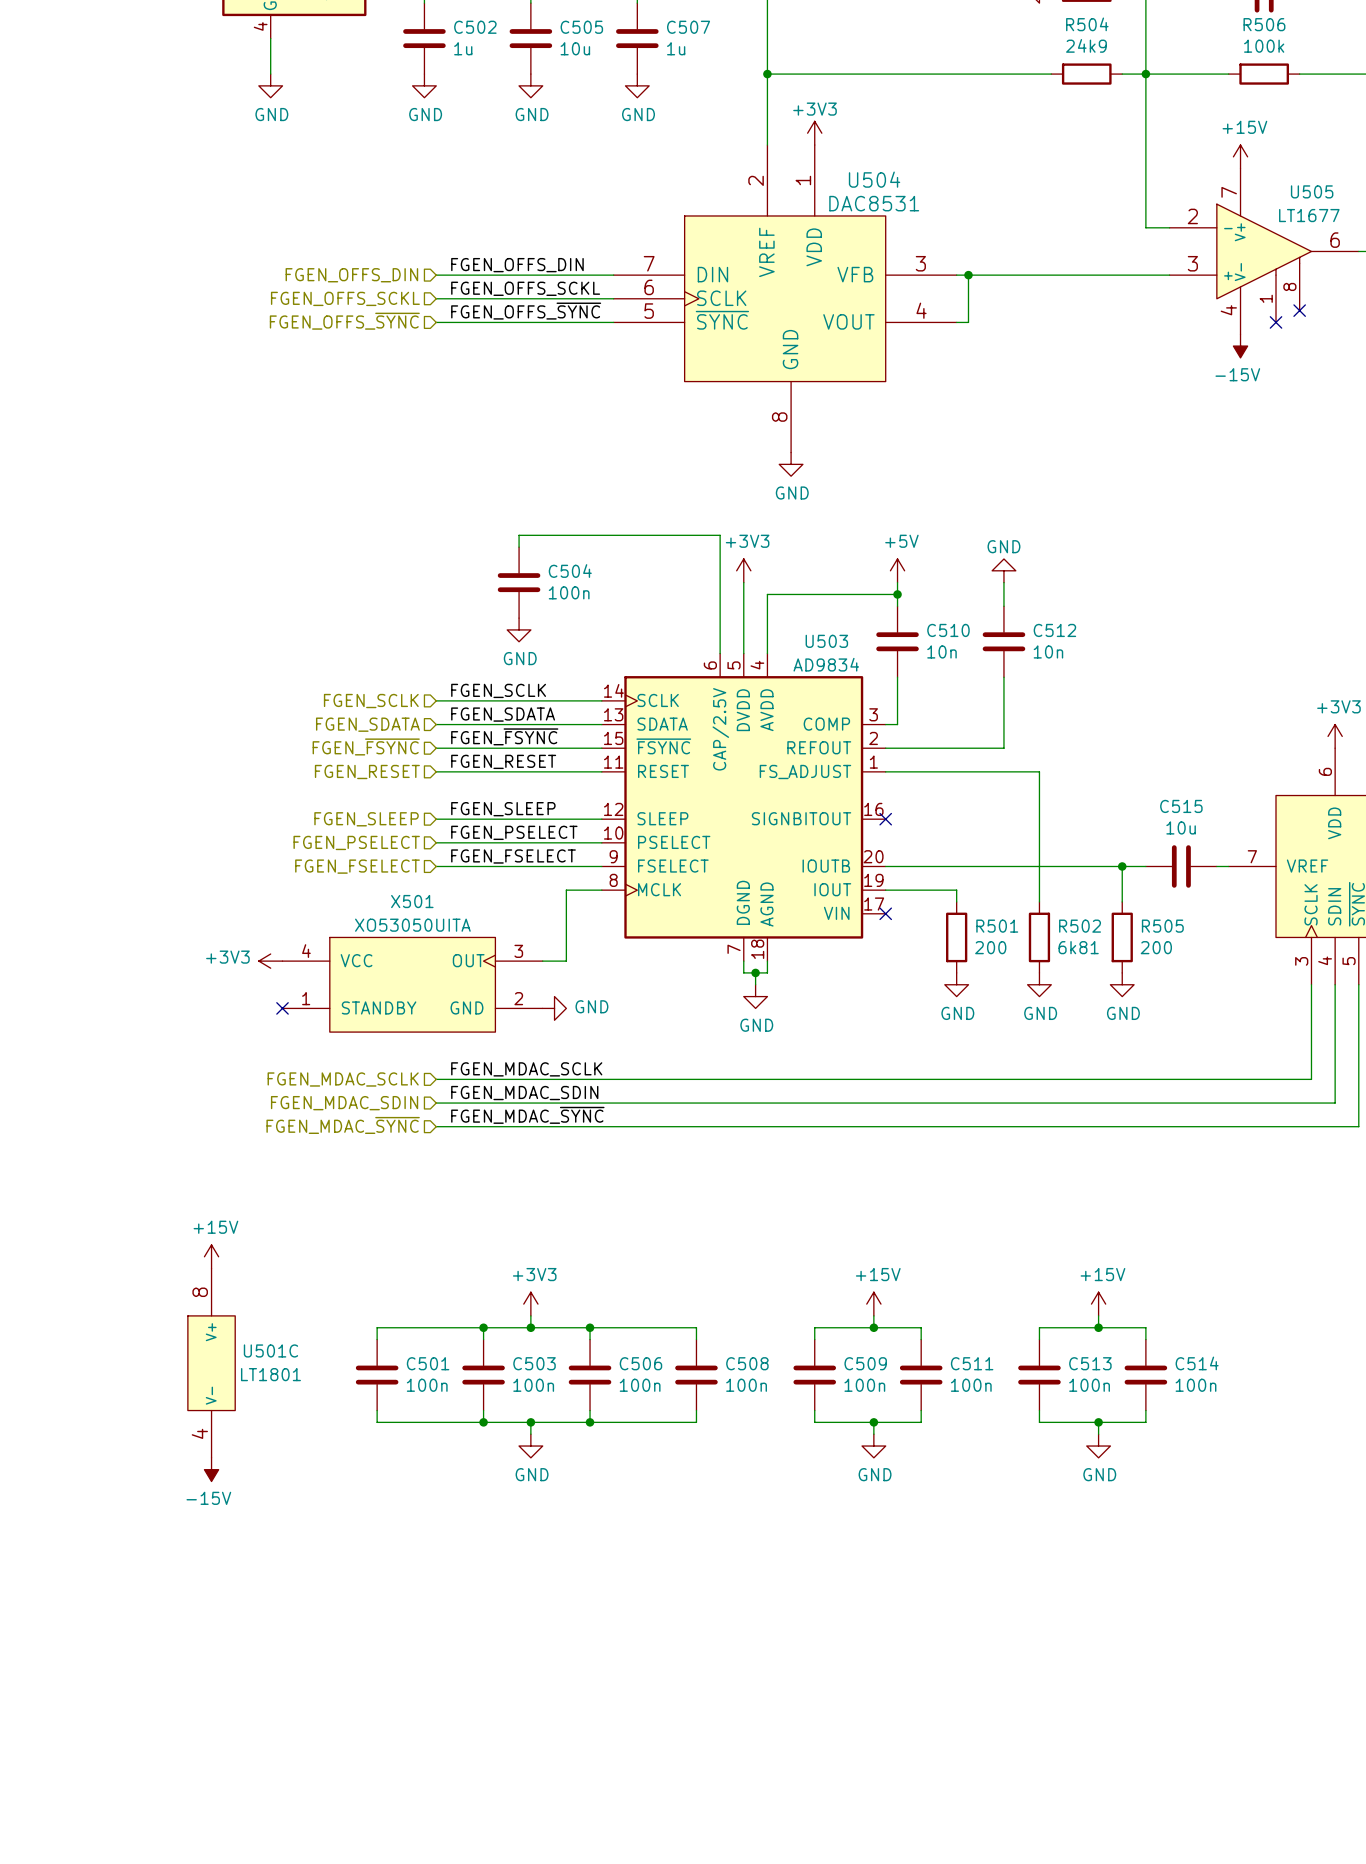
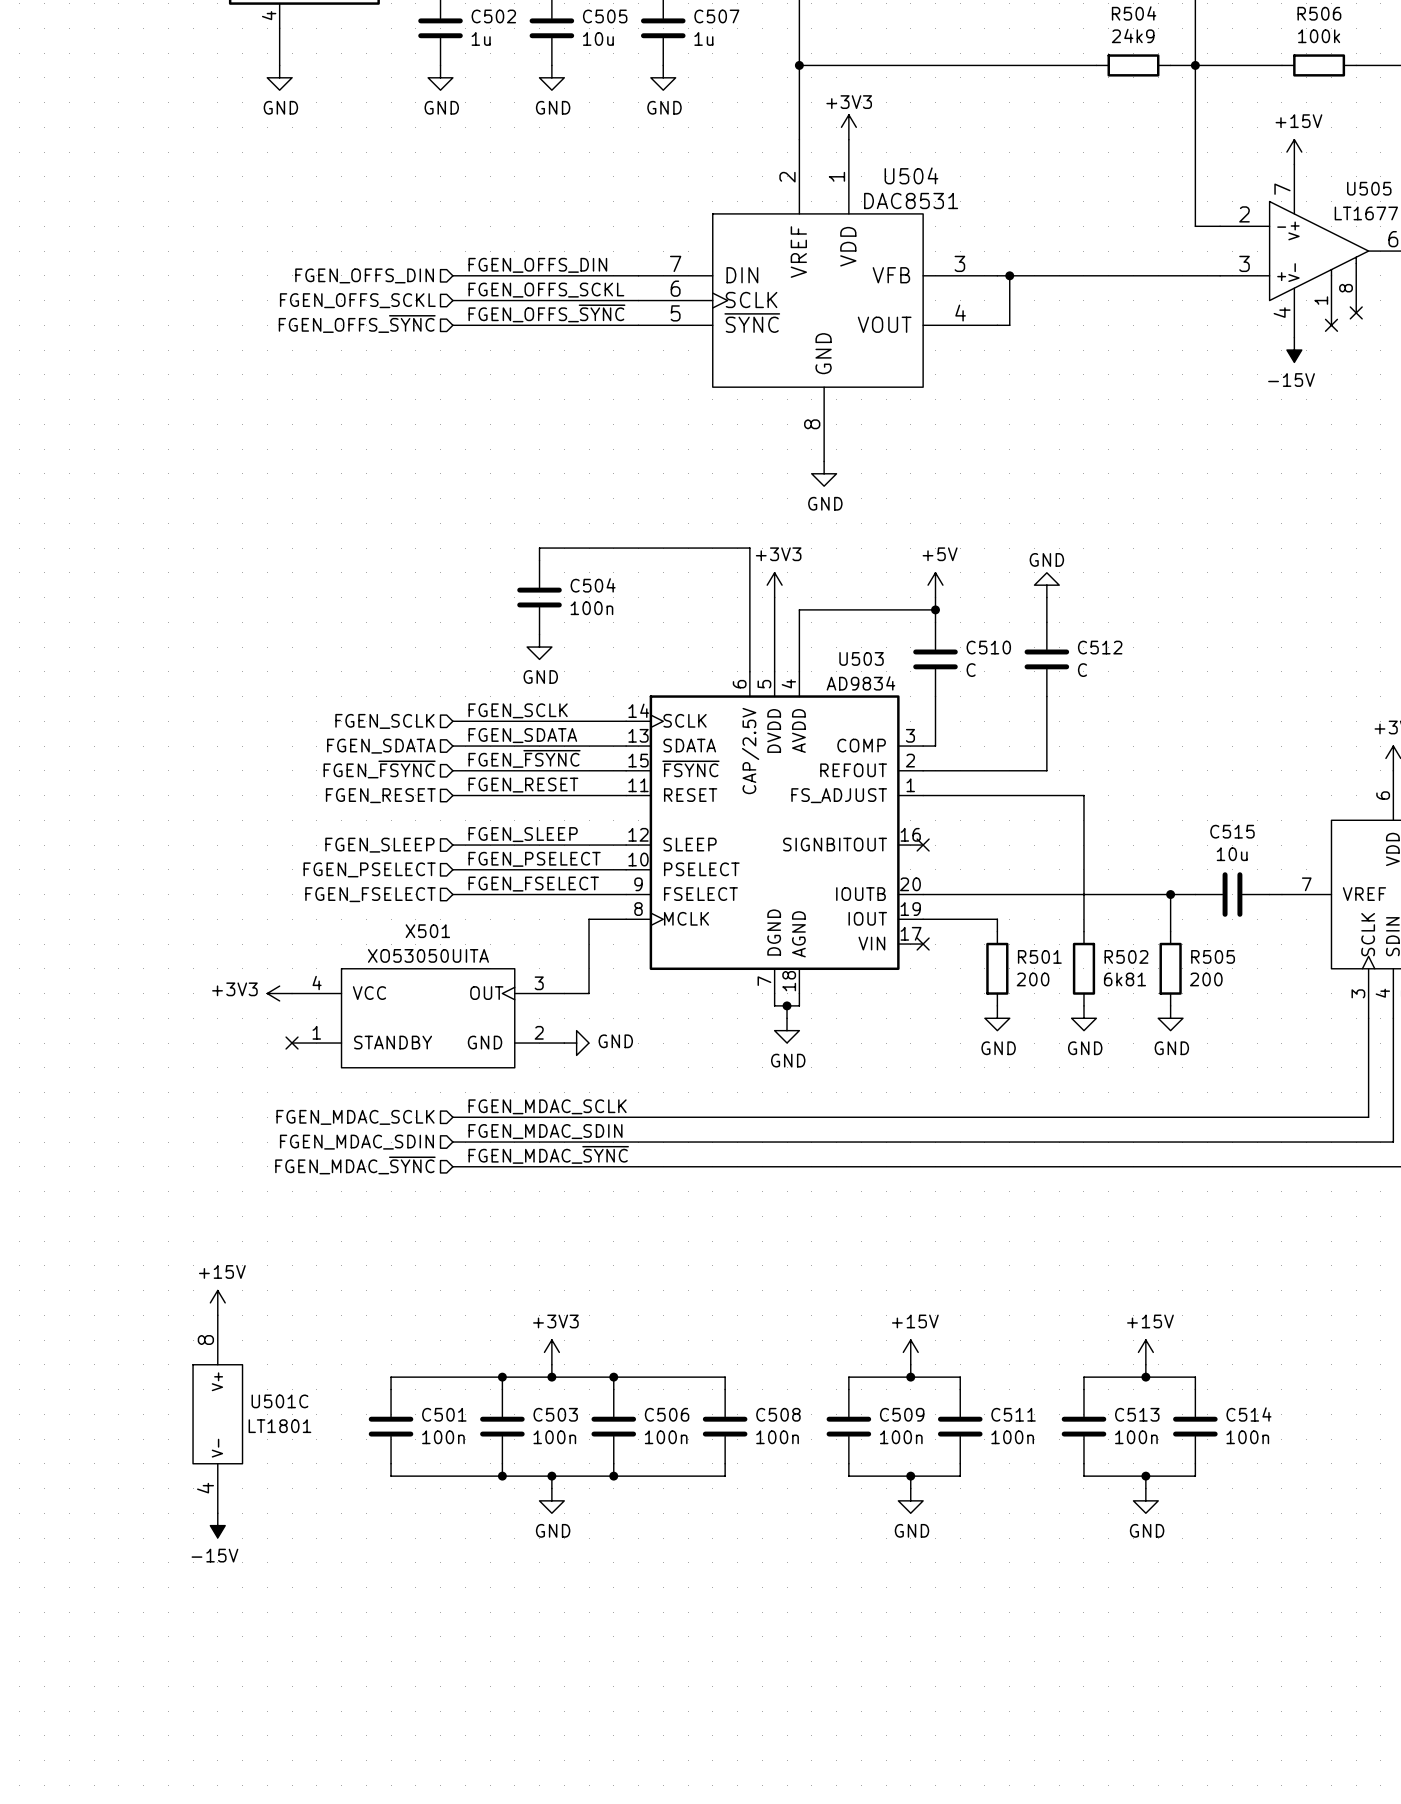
C510 value: 10n (941, 651) -> C (971, 670)
C512 value: 10n (1048, 651) -> C (1082, 670)

